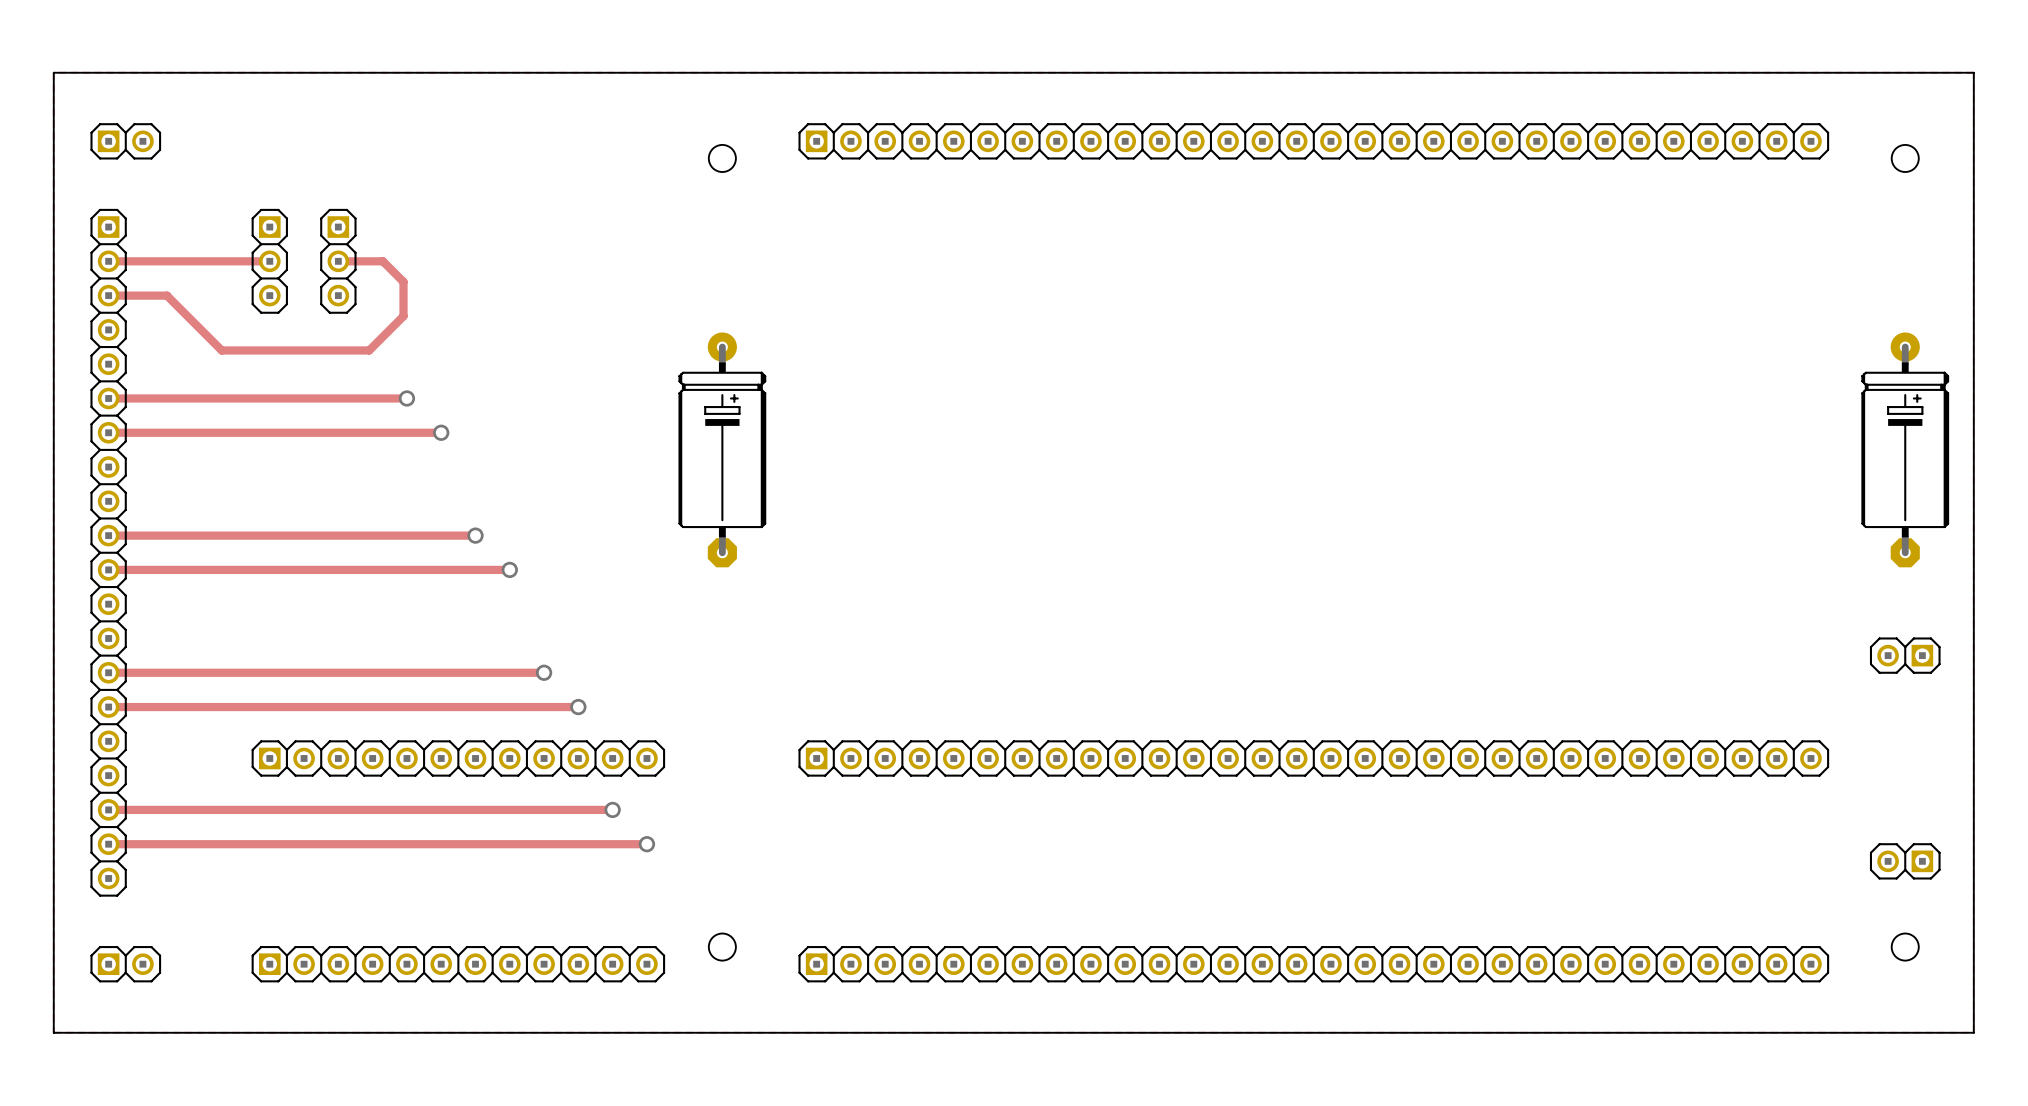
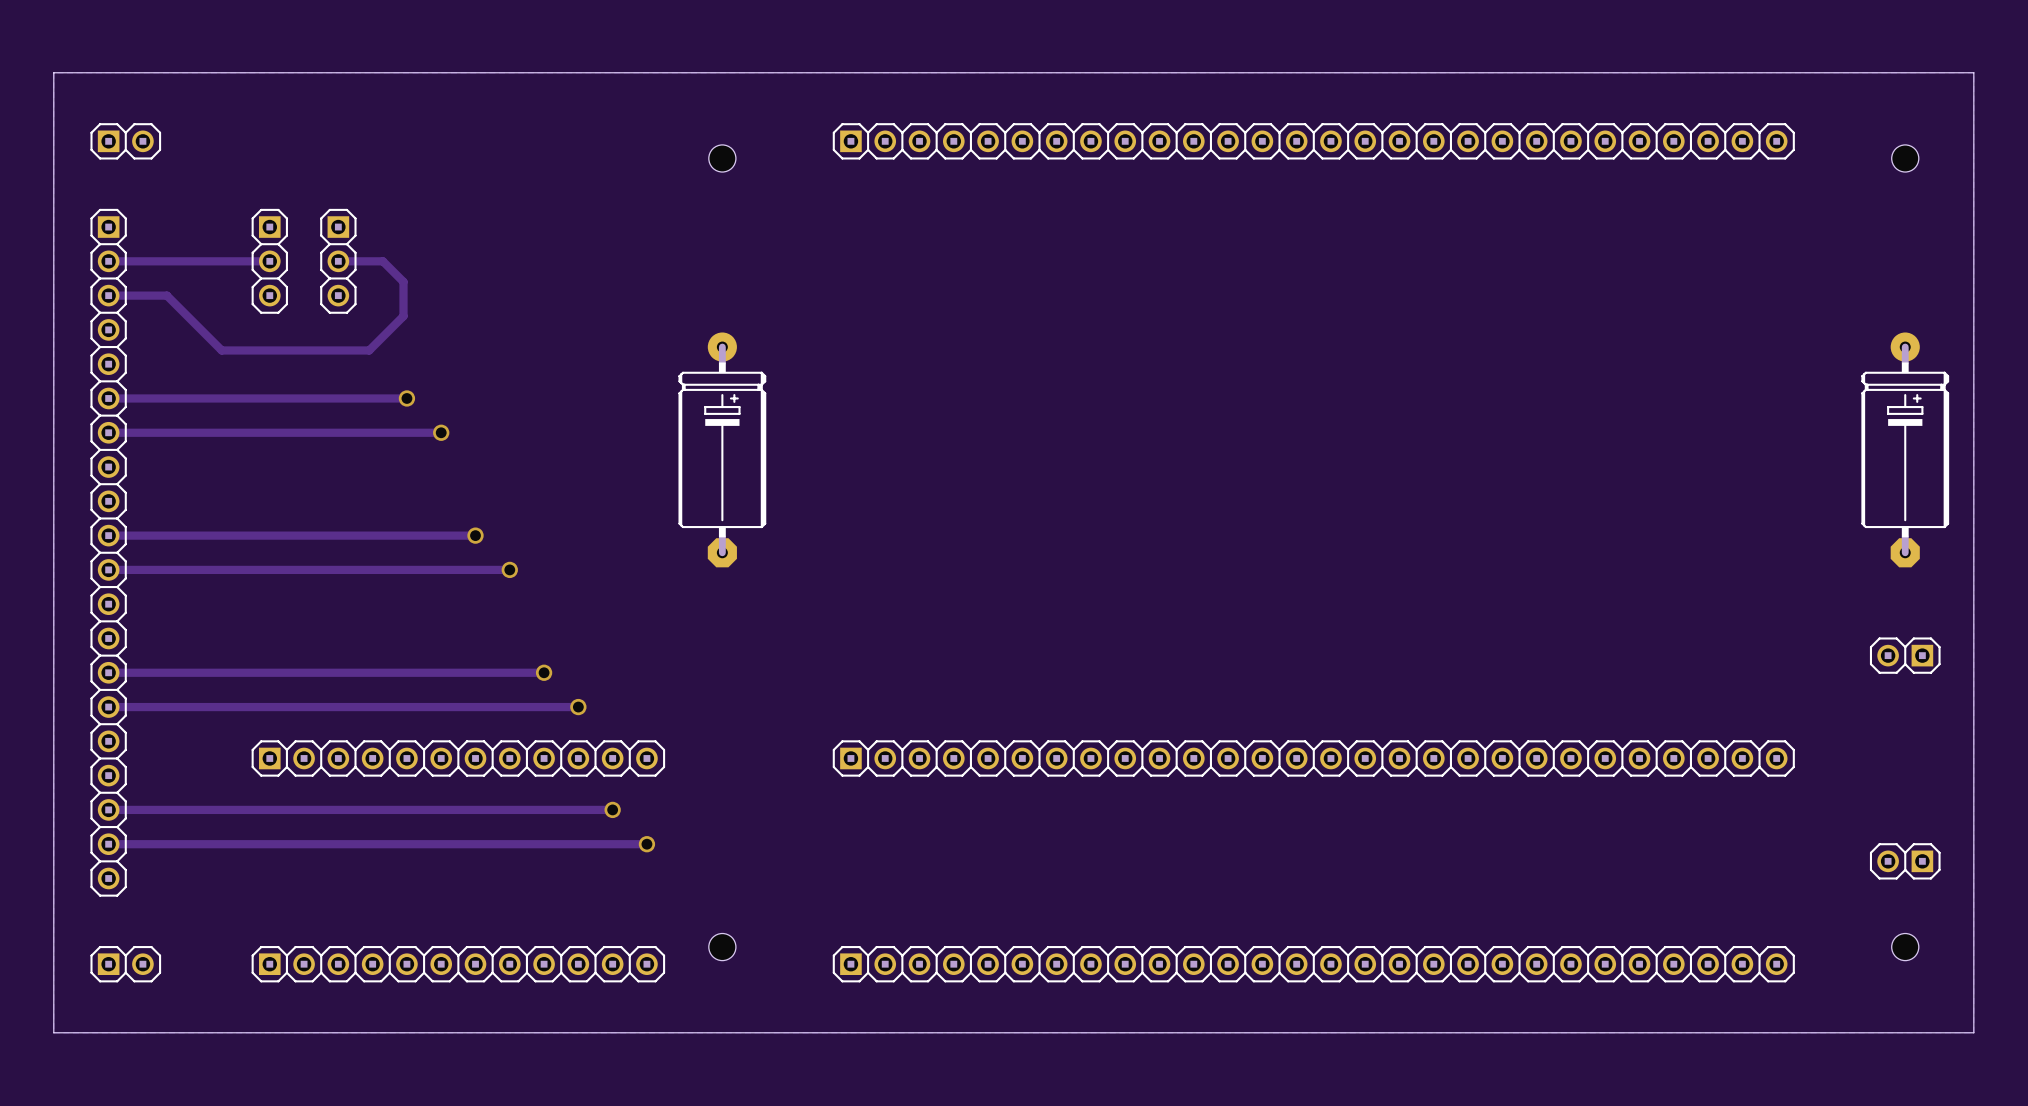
part footprint: [798, 123, 1830, 160] -> [832, 123, 1795, 160]
part footprint: [798, 740, 1830, 777] -> [832, 740, 1795, 777]
part footprint: [798, 946, 1830, 983] -> [832, 946, 1795, 983]

